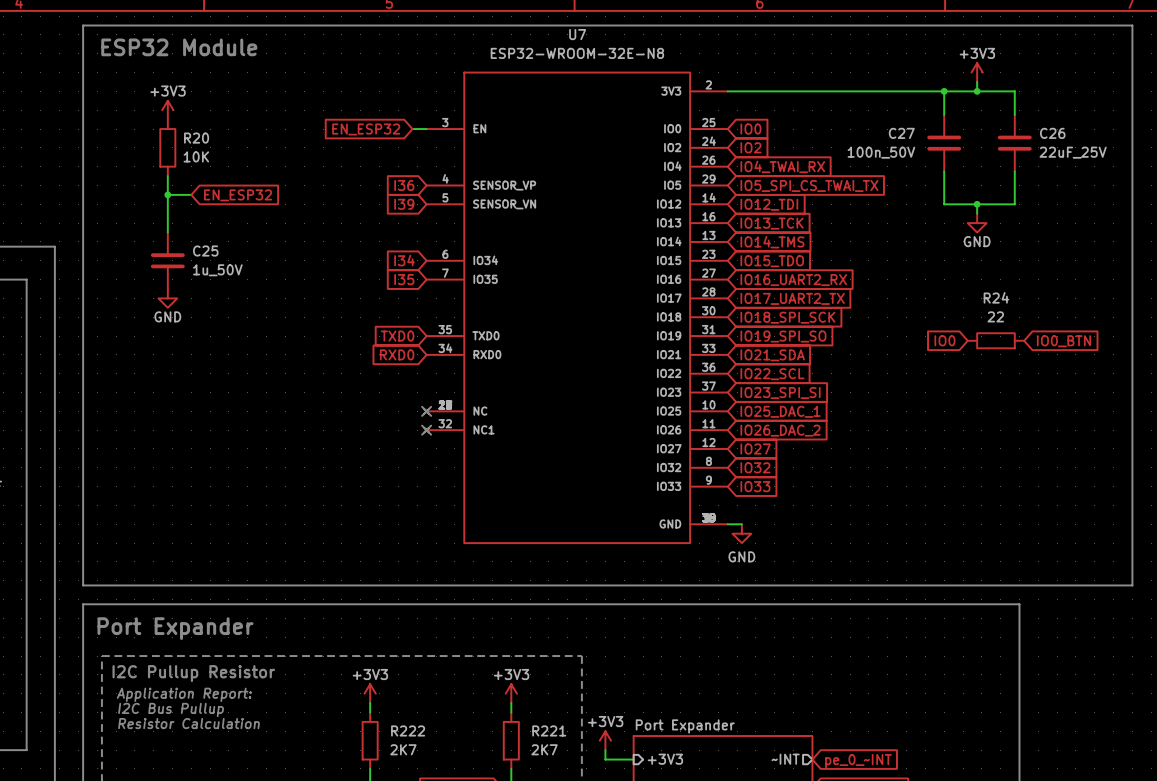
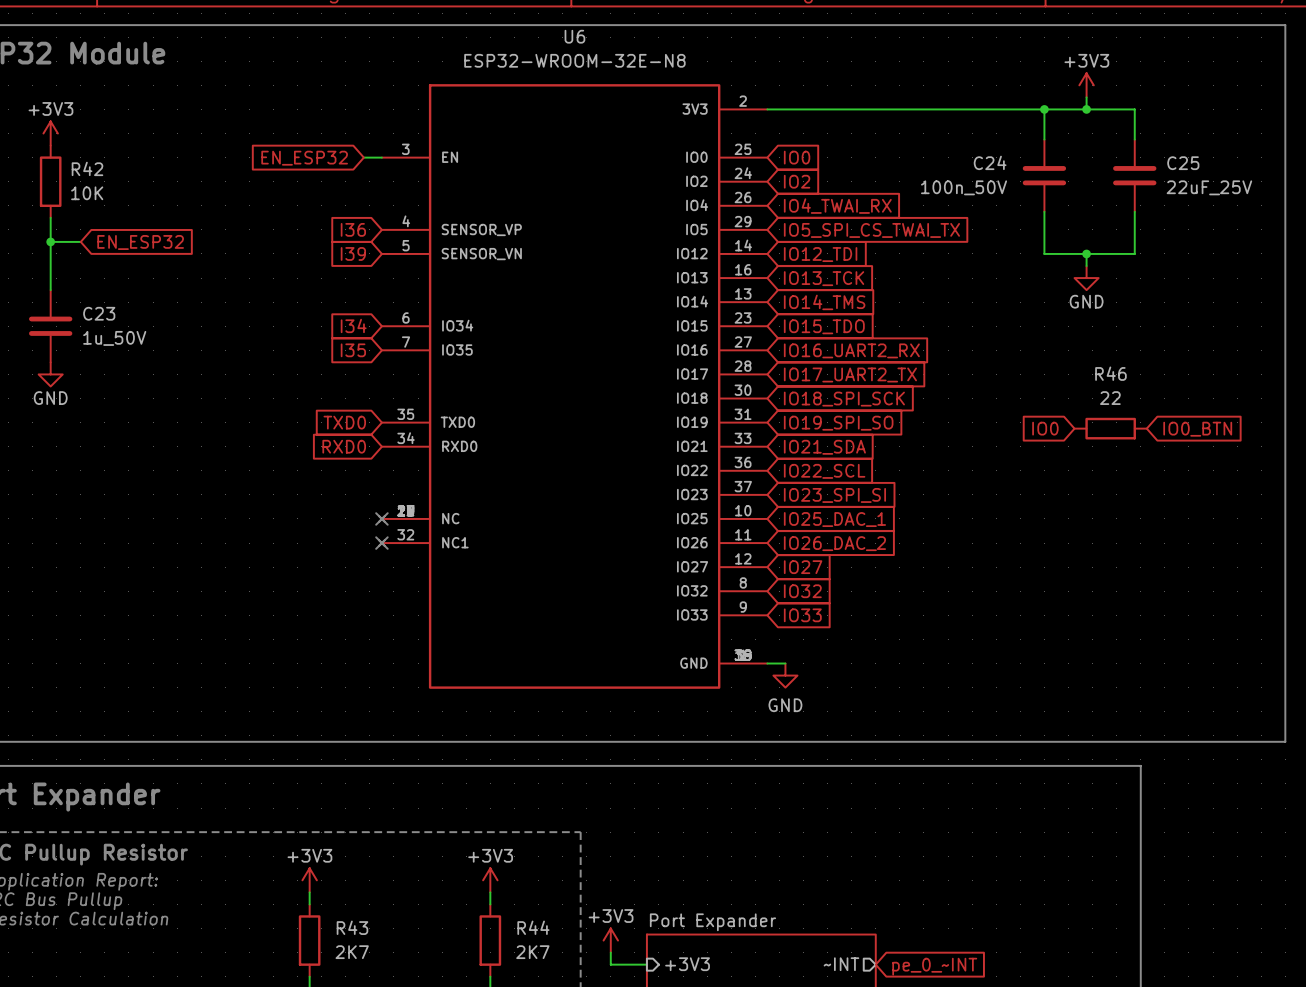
U7 name: U7 (577, 34) -> U6 (574, 36)
C27 name: C27 (901, 133) -> C24 (990, 162)
C26 name: C26 (1052, 133) -> C25 (1183, 163)
R20 name: R20 (196, 138) -> R42 (87, 168)
C25 name: C25 (205, 251) -> C23 (99, 313)
R24 name: R24 (996, 297) -> R46 (1110, 373)
R222 name: R222 (408, 730) -> R43 (352, 927)
R221 name: R221 (549, 730) -> R44 (533, 927)

